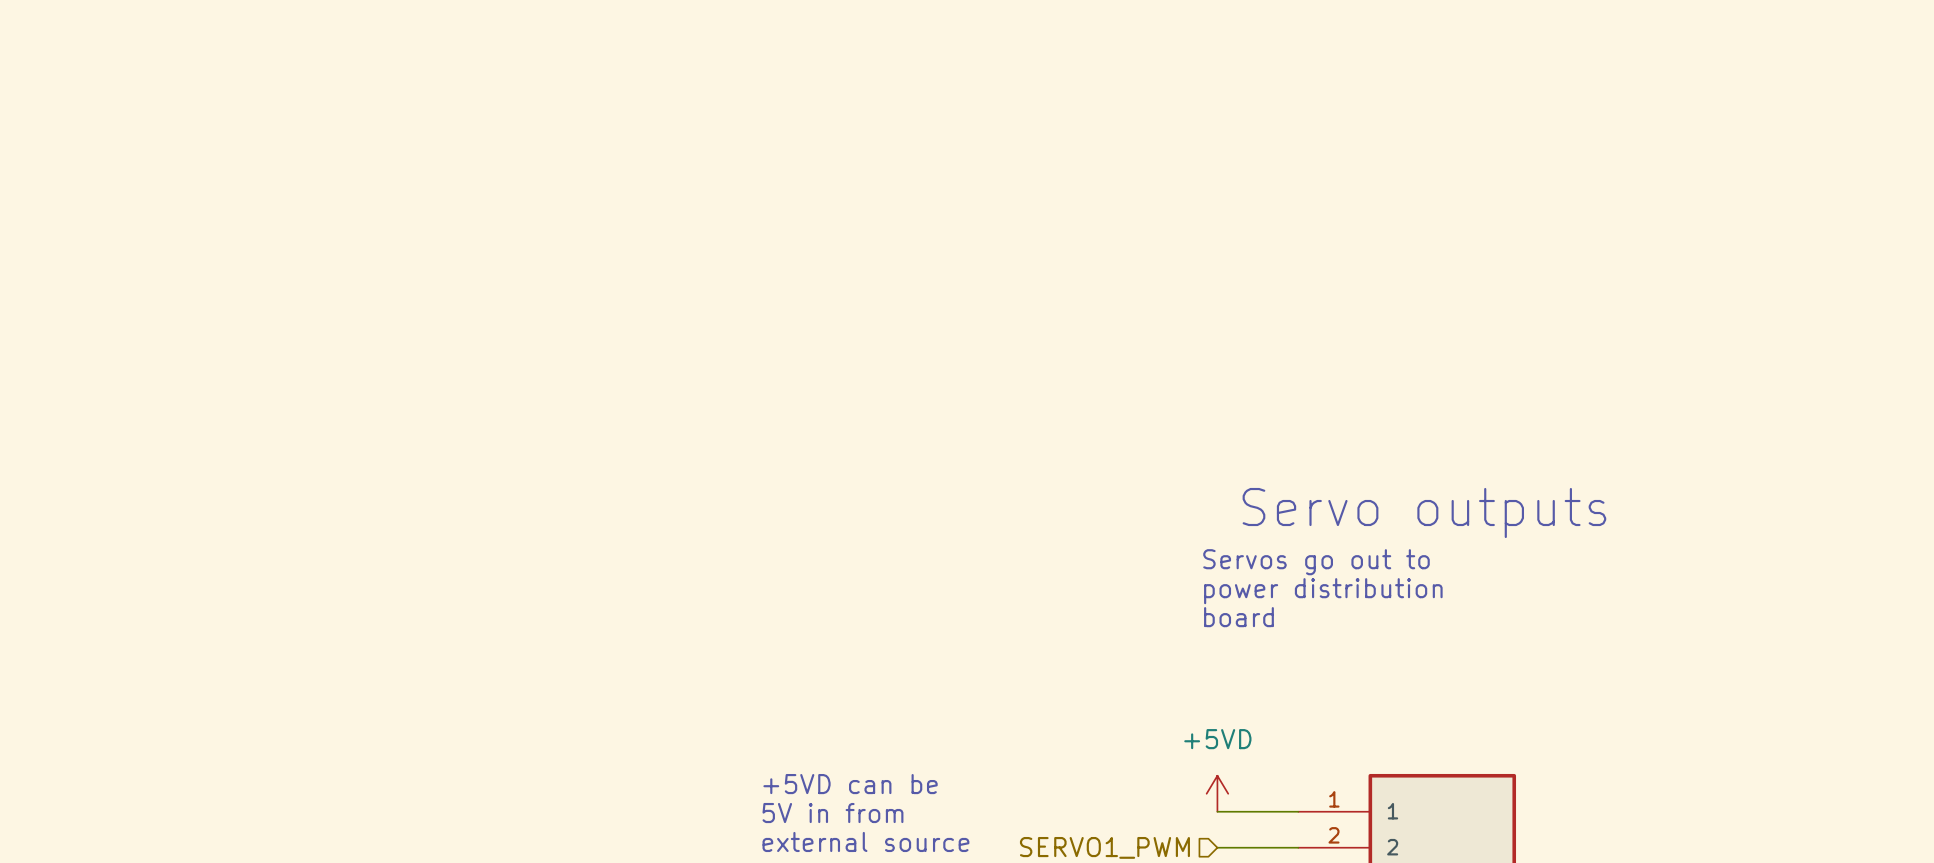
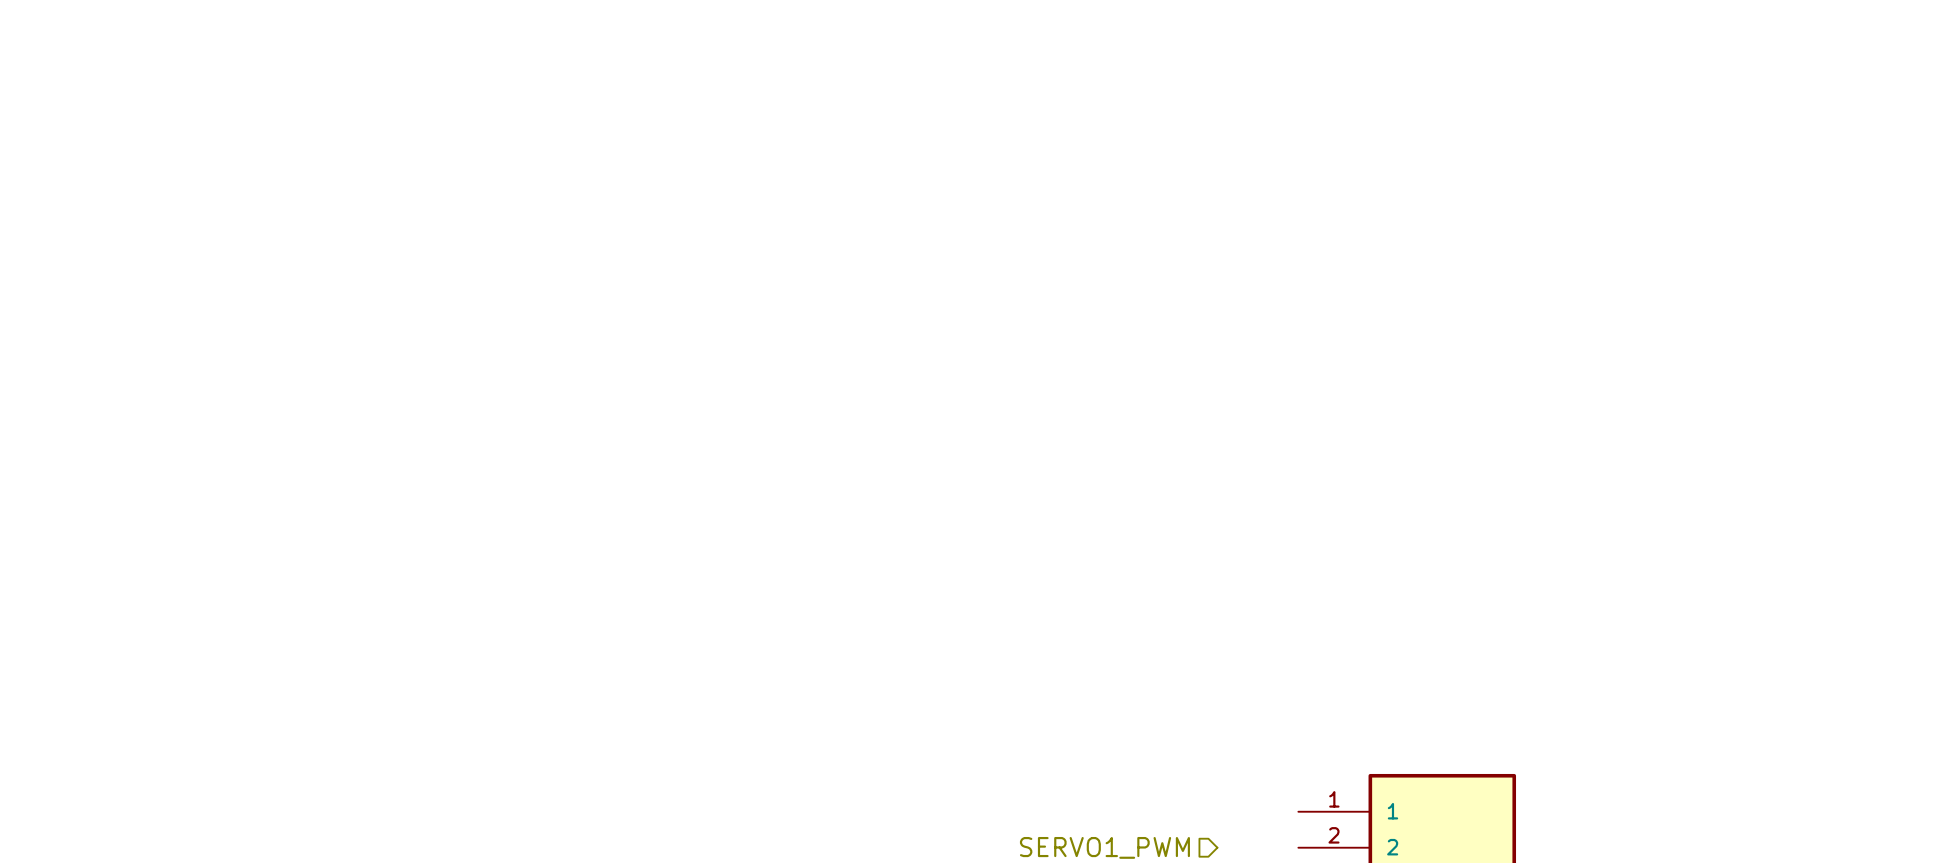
text: Servo outputs (1424, 513) -> none
text: Servos go out to (1316, 562) -> none
text: power distribution (1323, 591) -> none
text: board (1238, 617) -> none
text: +5VD can be (850, 784) -> none
power symbol: +5VD (1217, 793) -> none
wire: (1217, 811) (1298, 811) -> none
text: 5V in from (832, 813) -> none
text: external source (865, 841) -> none
wire: (1217, 847) (1298, 847) -> none

